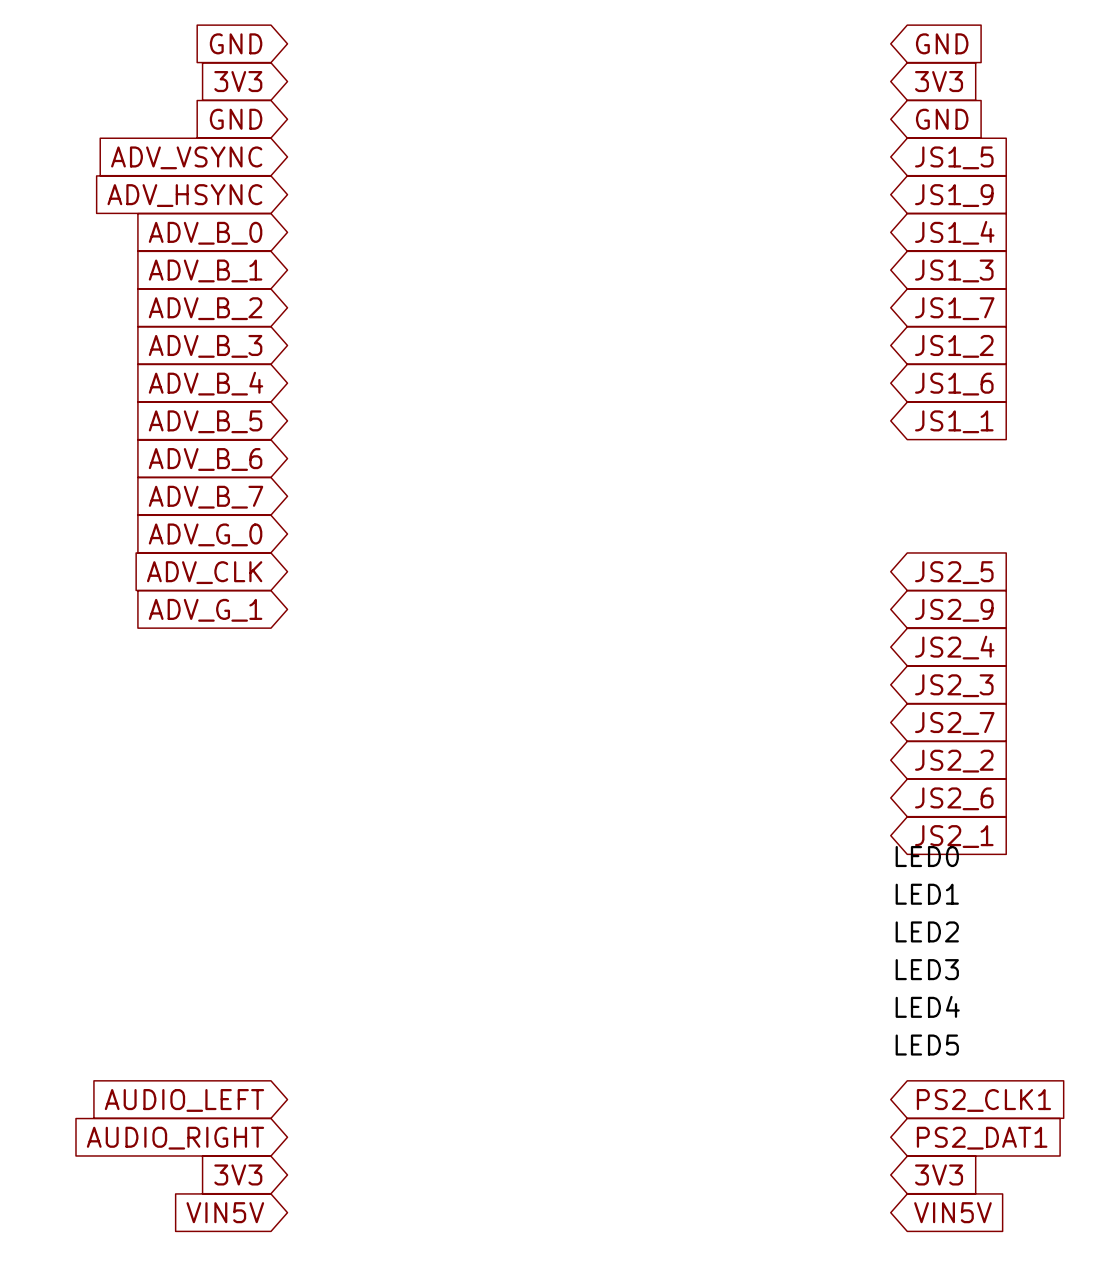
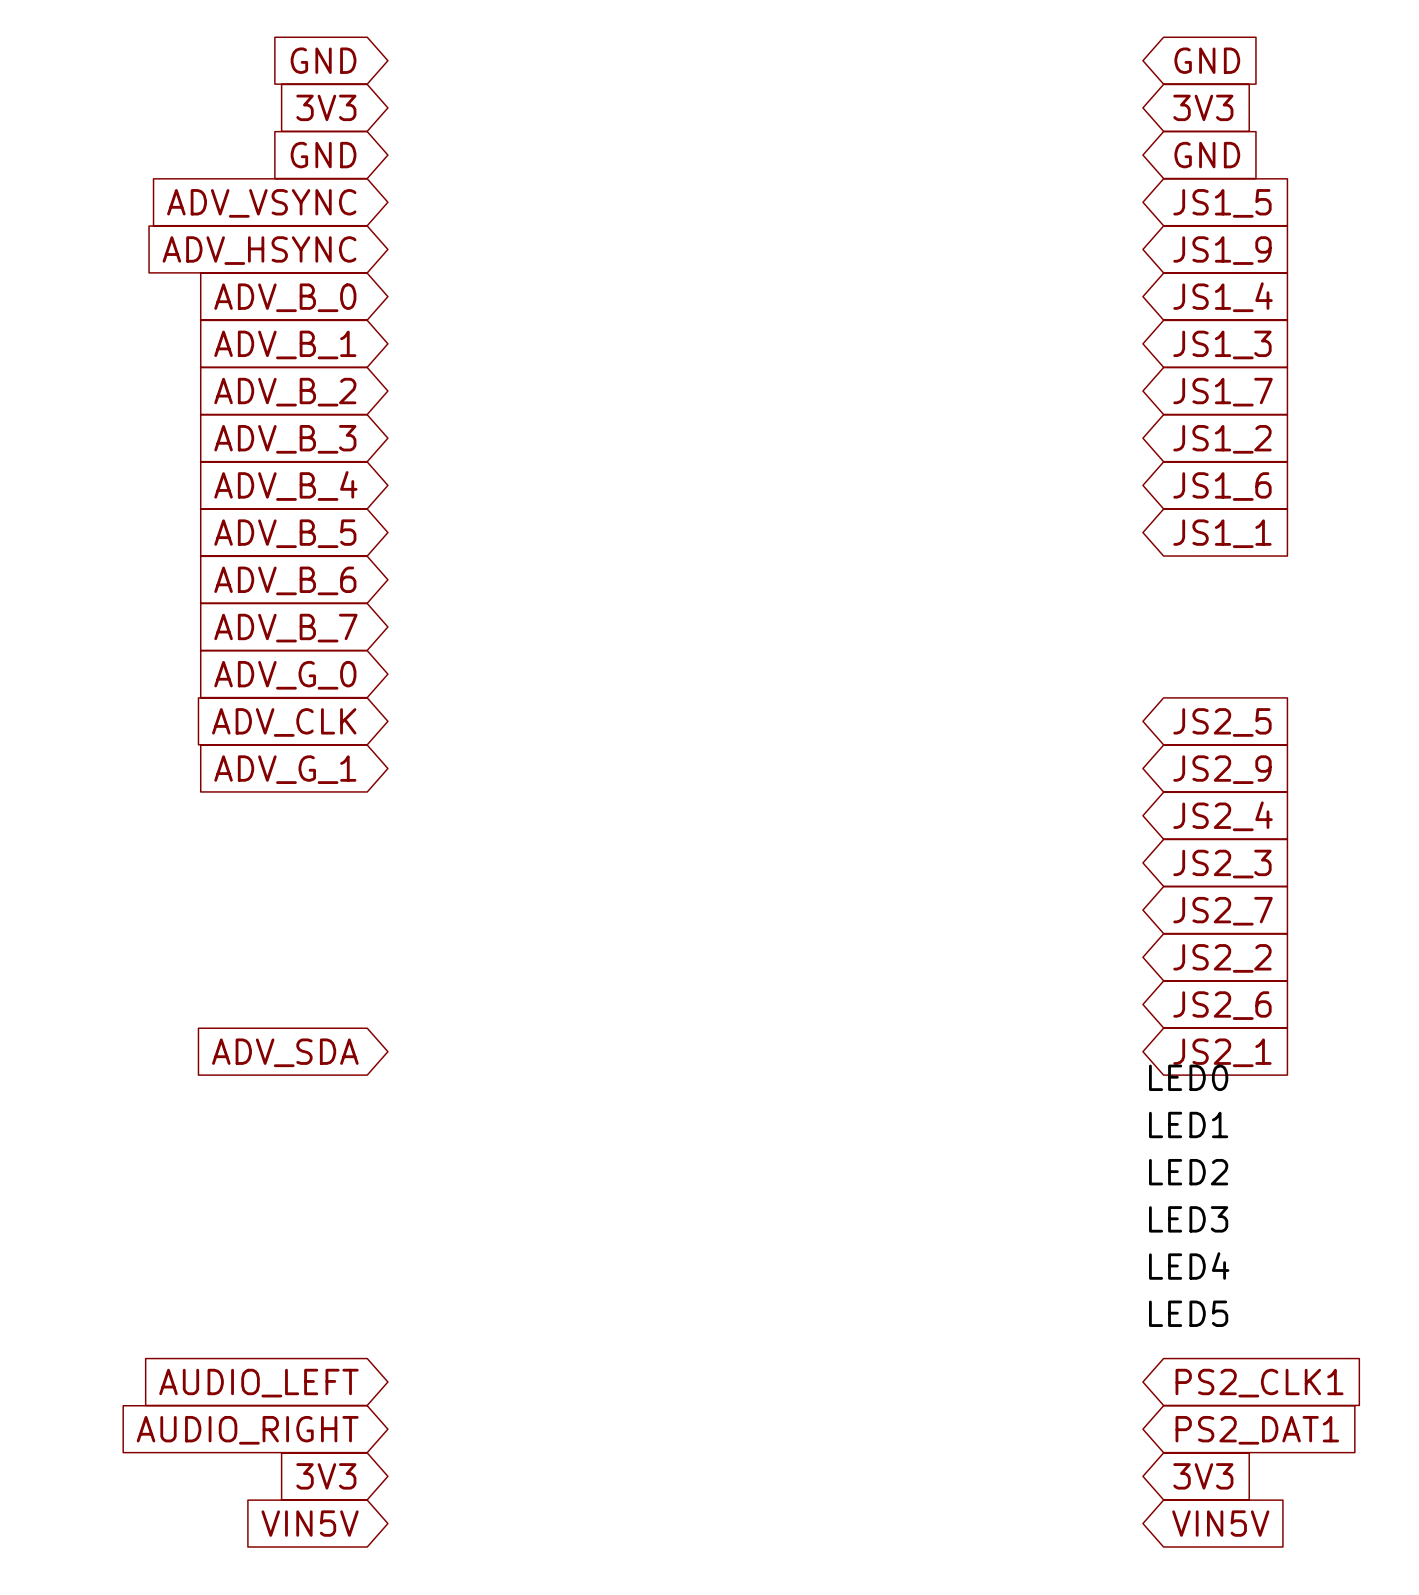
global label: none -> ADV_SDA (285, 1052)

